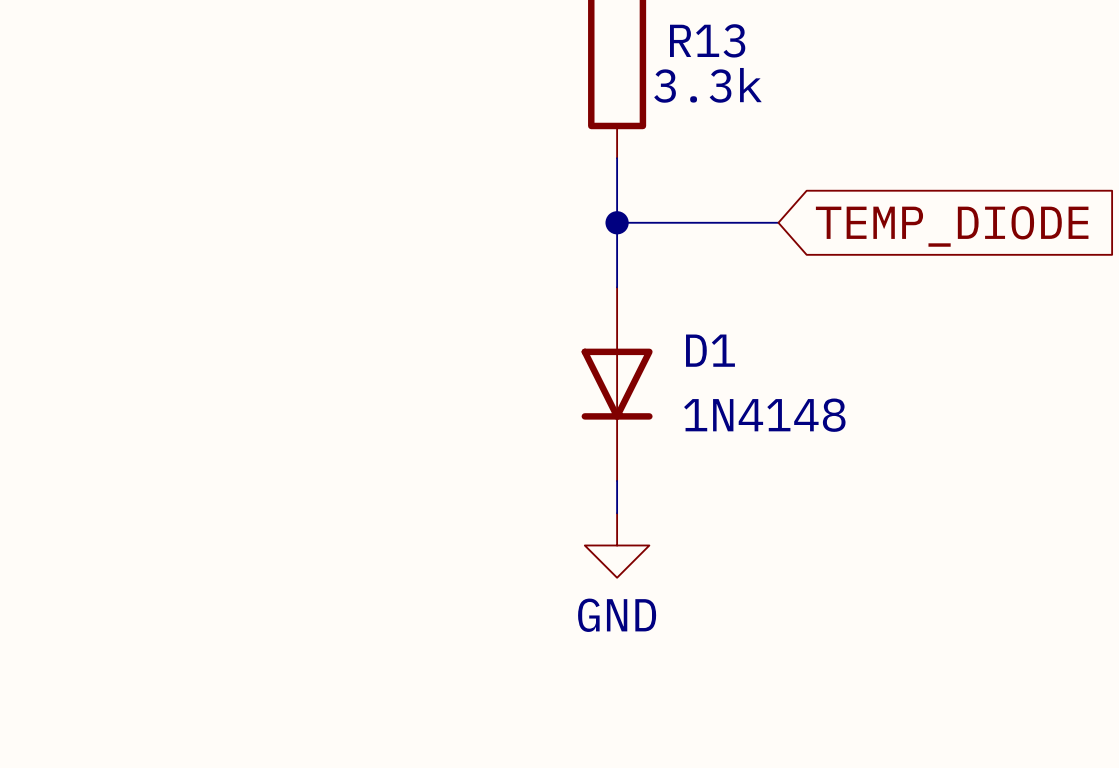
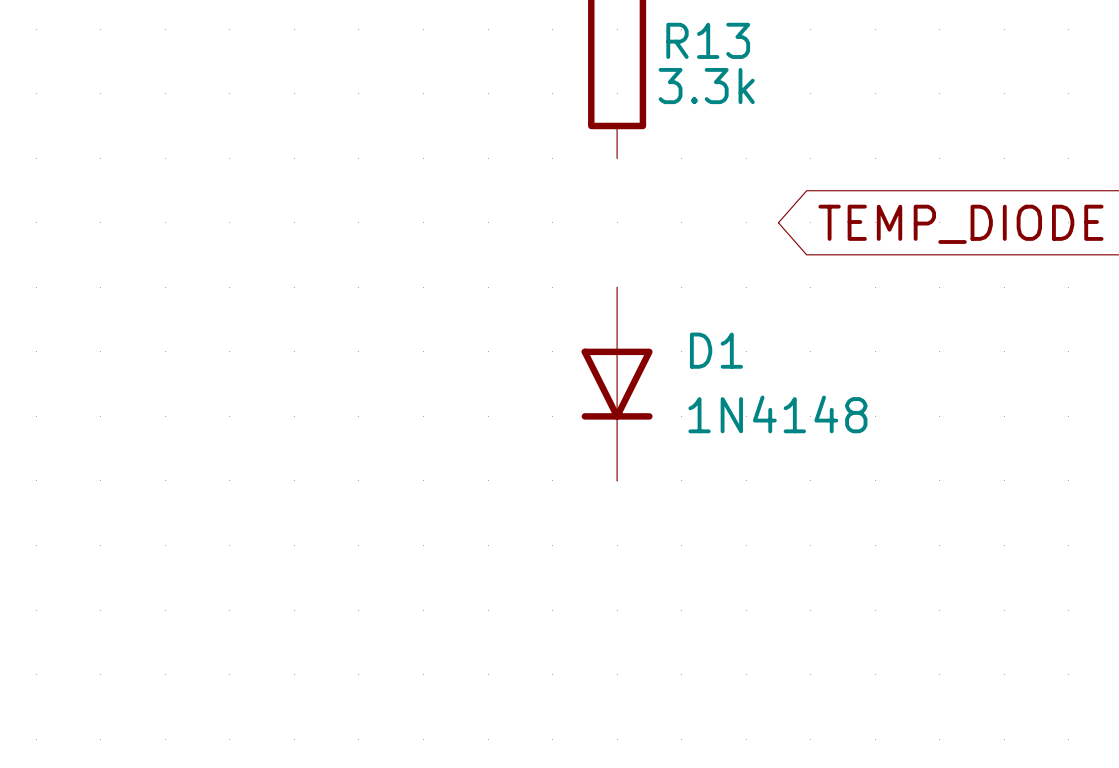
wire: (617, 158) (617, 287) -> none
wire: (617, 222) (778, 222) -> none
junction: (617, 222) -> none
wire: (617, 480) (617, 513) -> none
power symbol: GND (617, 545) -> none

